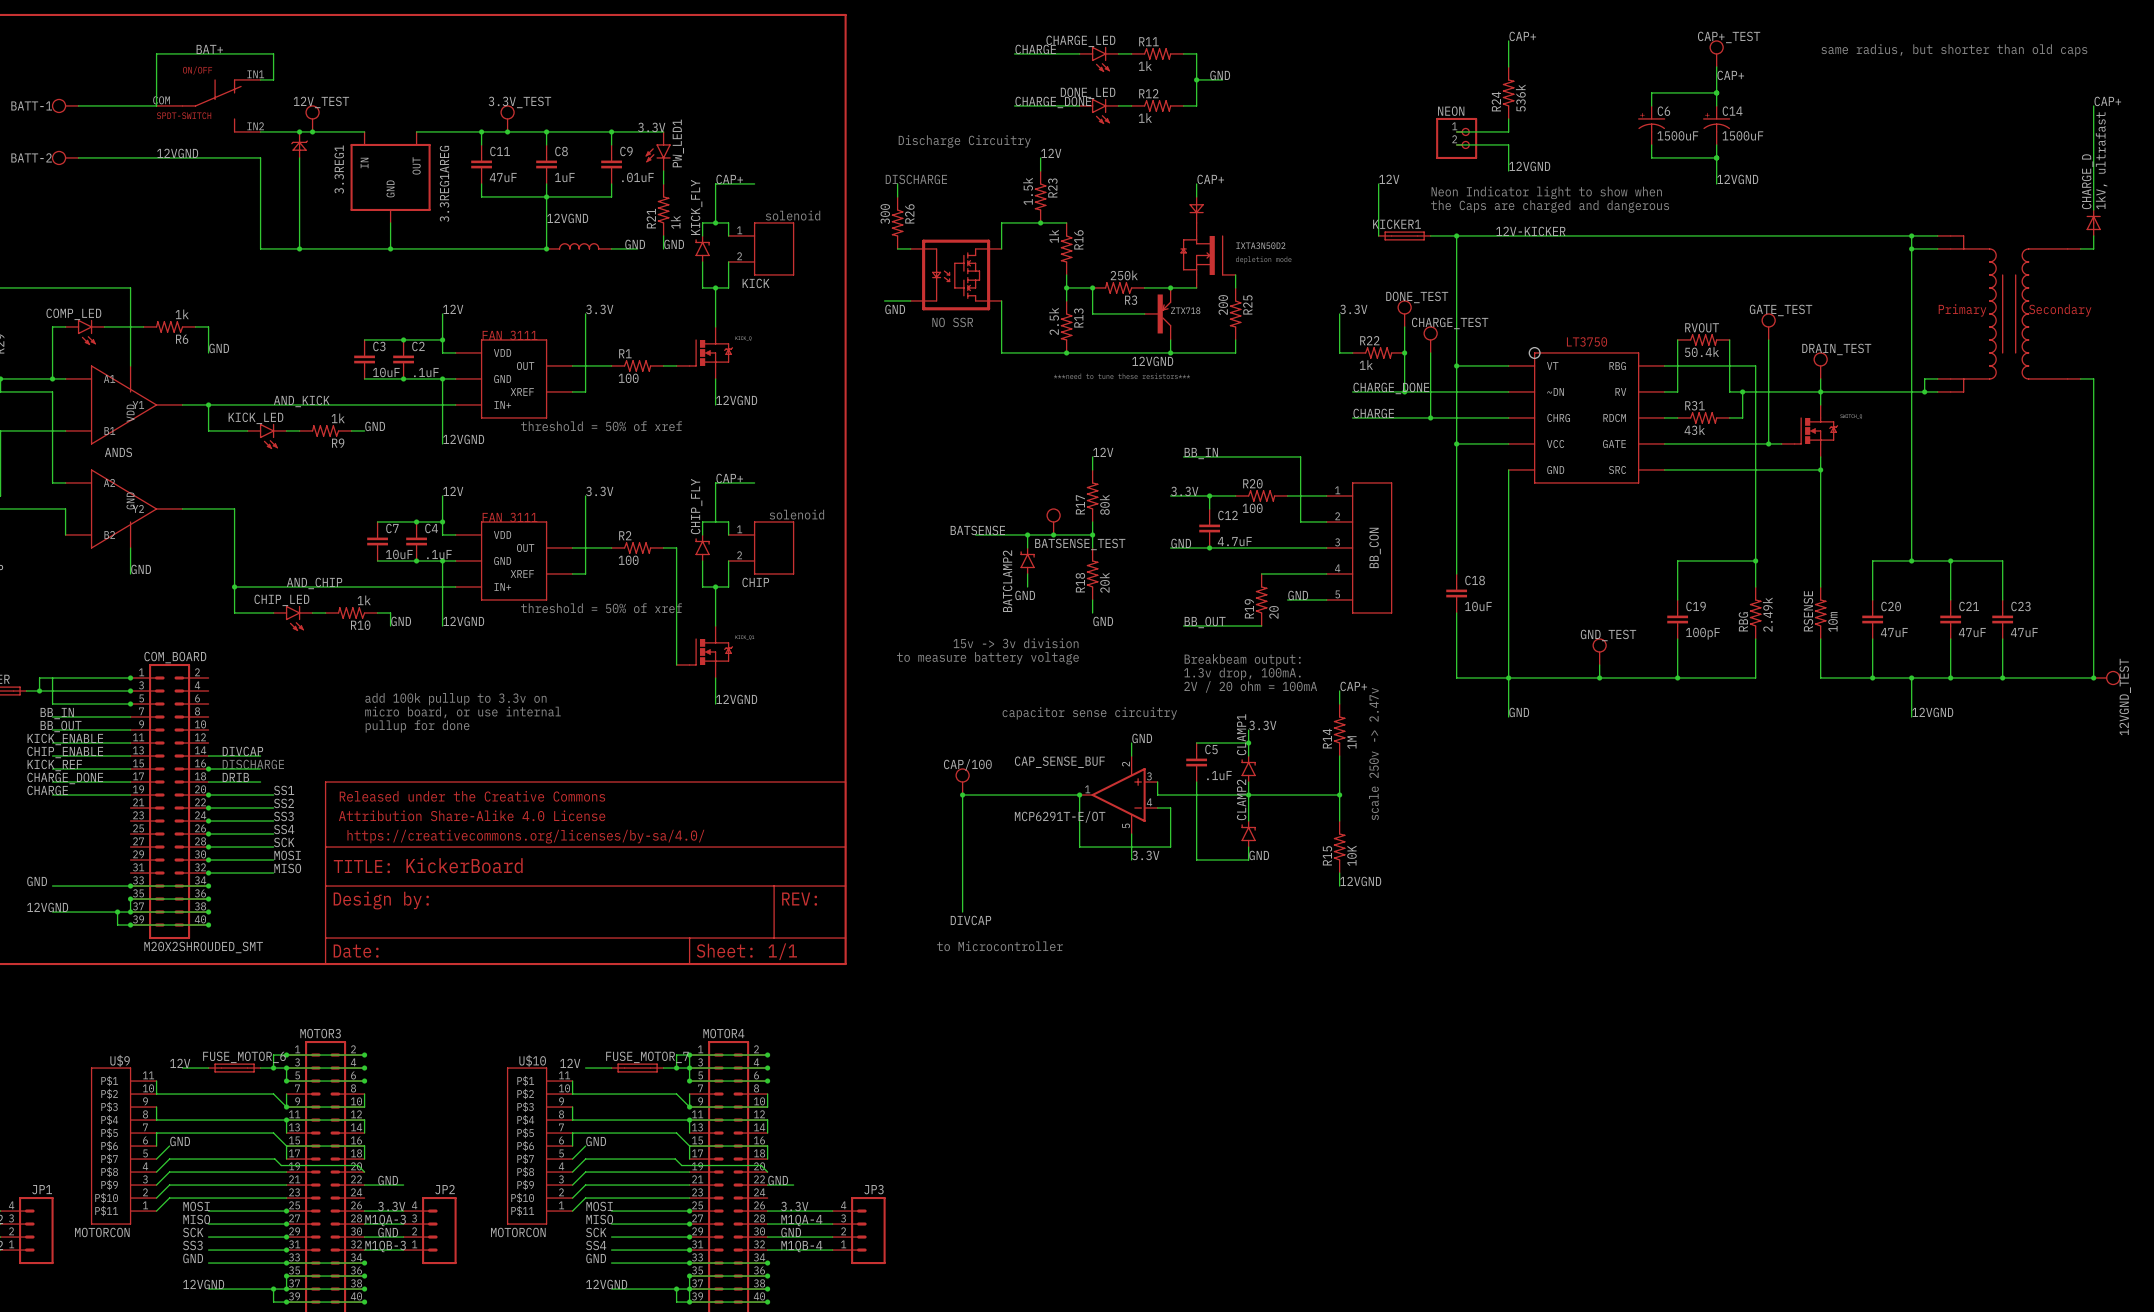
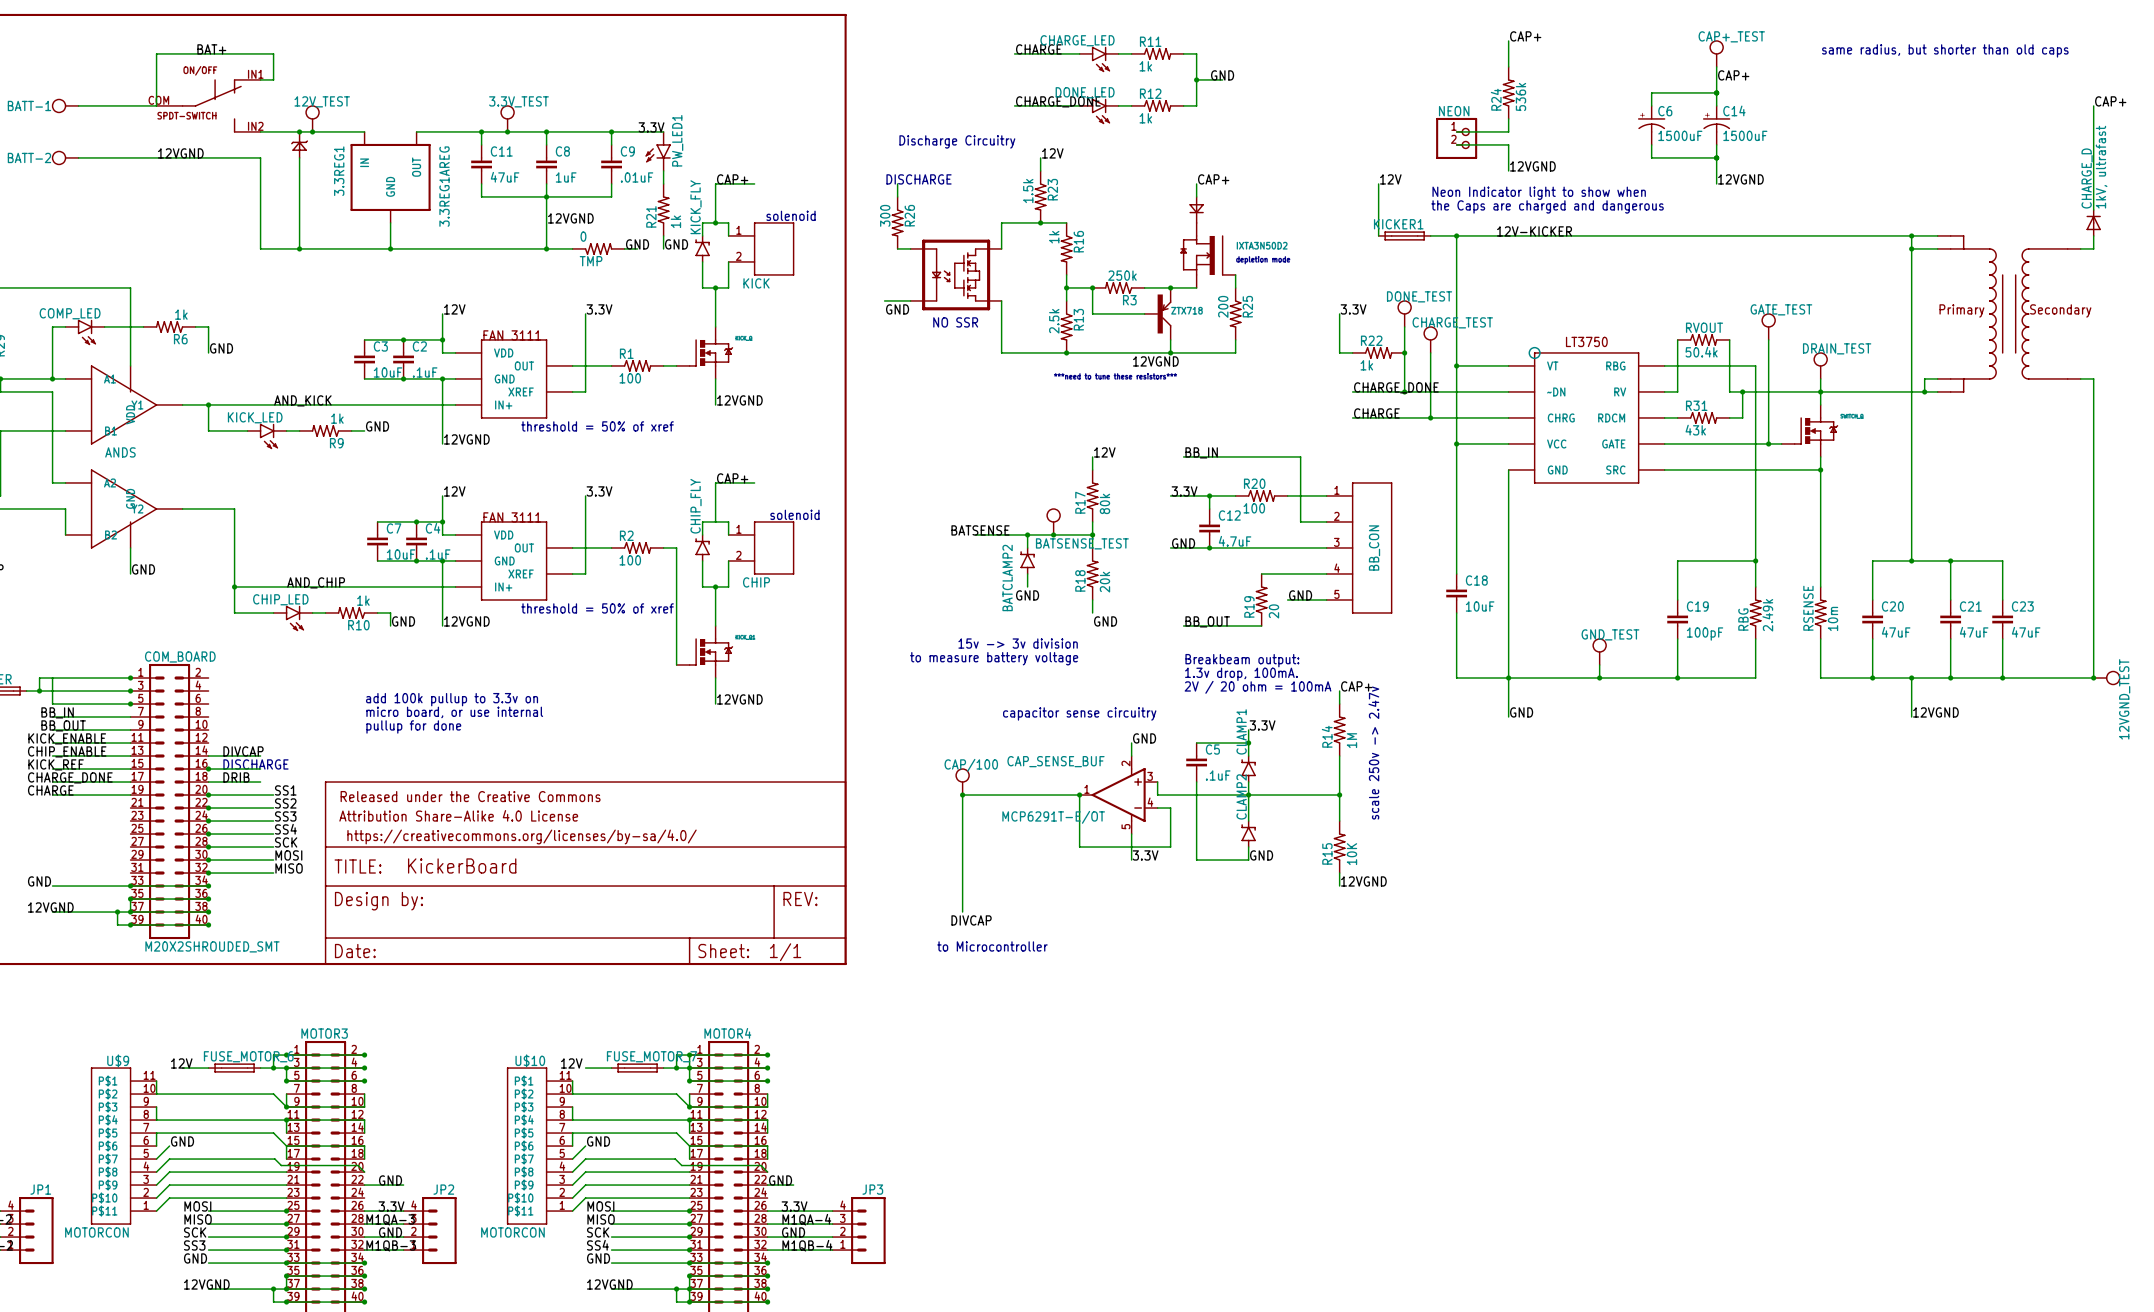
part: (579, 246) -> none
TMP: none -> 0 (598, 248)

